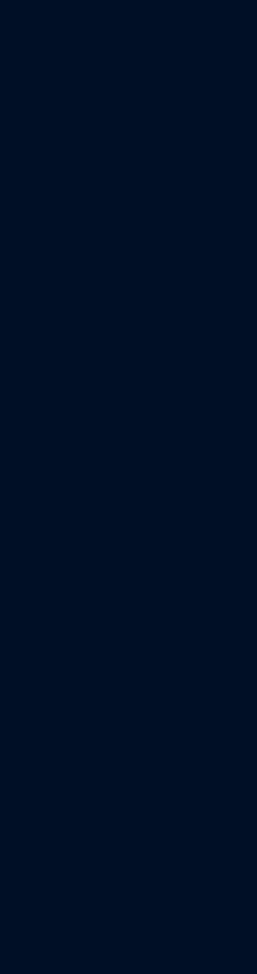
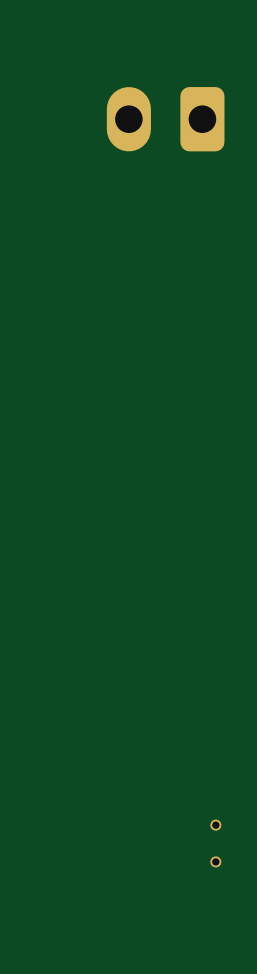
part: none -> (165, 119)
part: none -> (215, 843)

